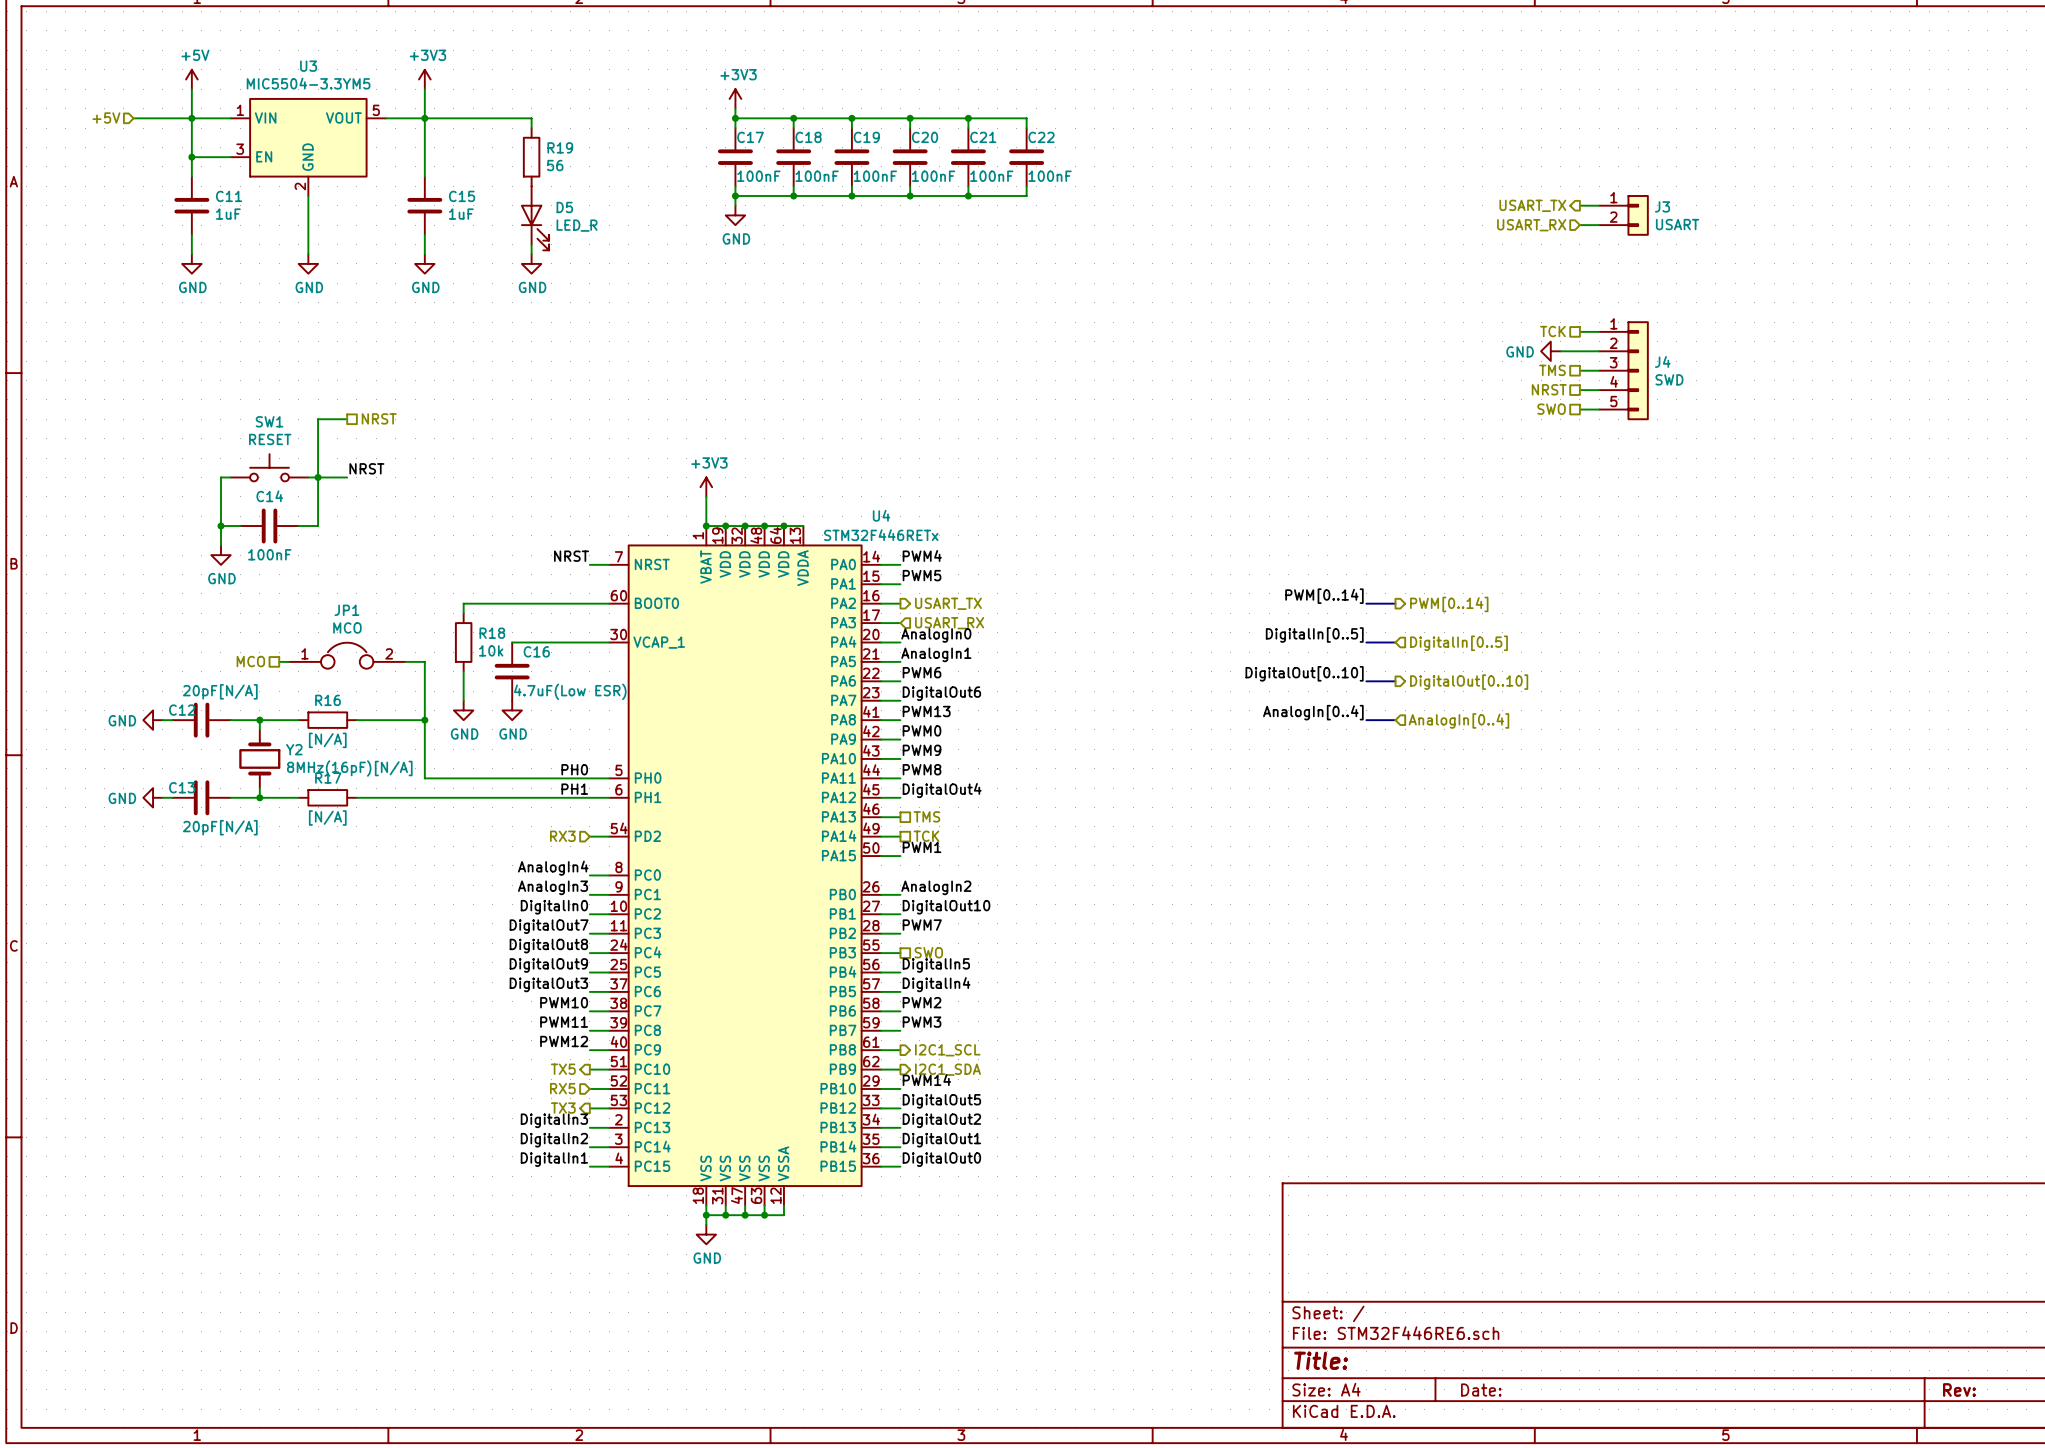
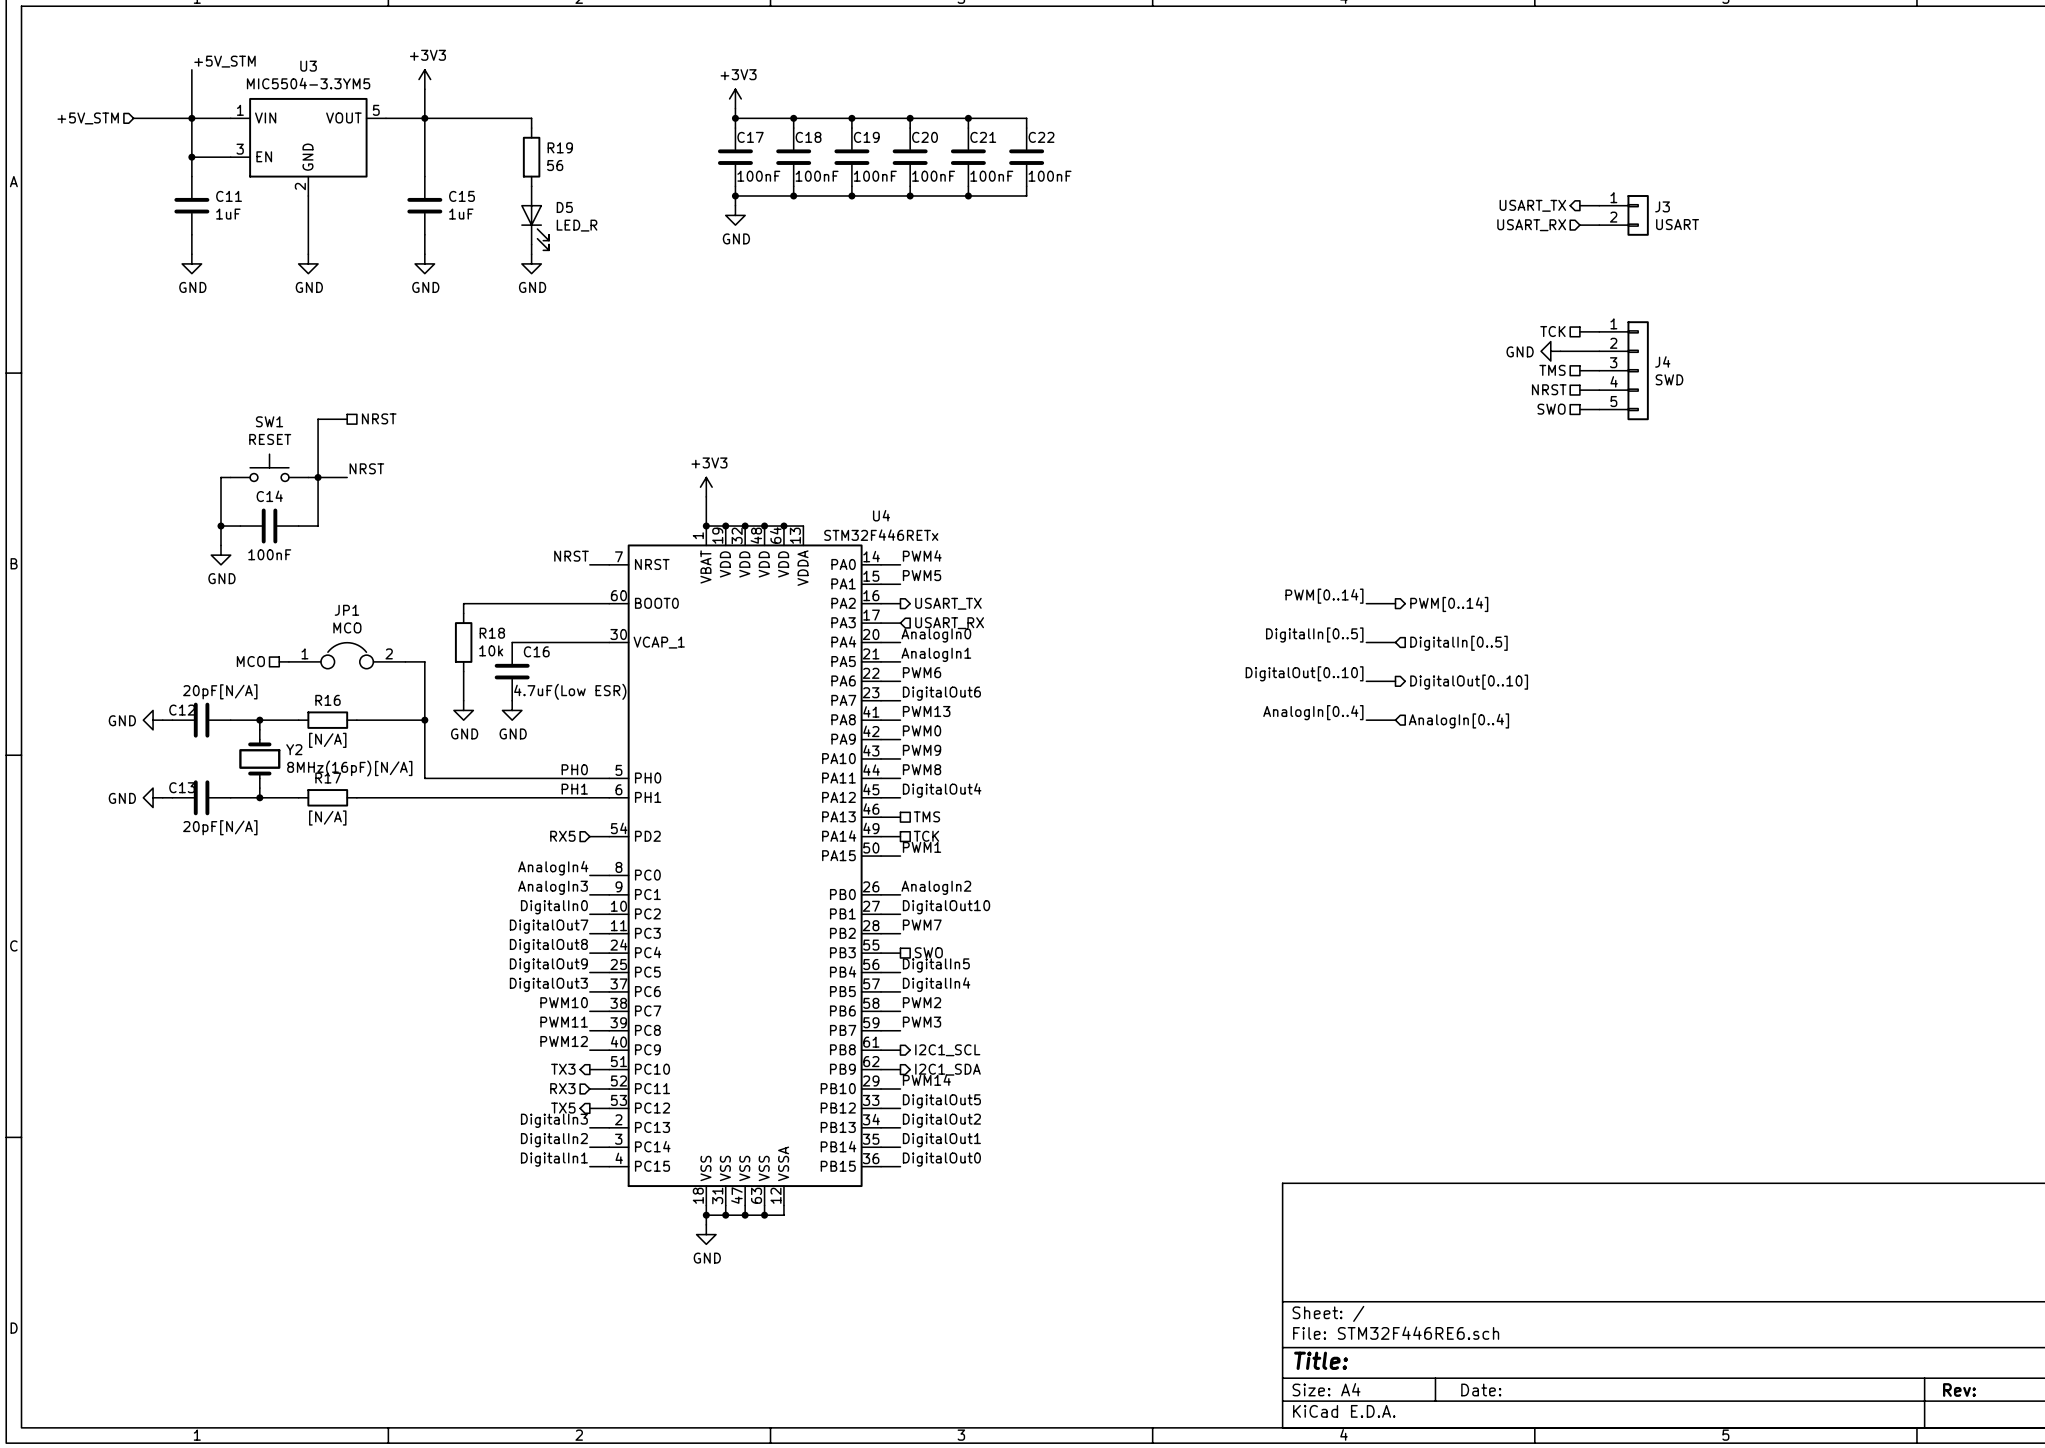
label: none -> +5V_STM (224, 61)
power symbol: +5V (191, 79) -> none
hierarchical label: +5V (106, 117) -> +5V_STM (88, 118)
hierarchical label: RX3 (562, 836) -> RX5 (562, 836)
hierarchical label: TX5 (563, 1069) -> TX3 (563, 1069)
hierarchical label: RX5 (562, 1088) -> RX3 (562, 1088)
hierarchical label: TX3 (563, 1108) -> TX5 (563, 1108)

